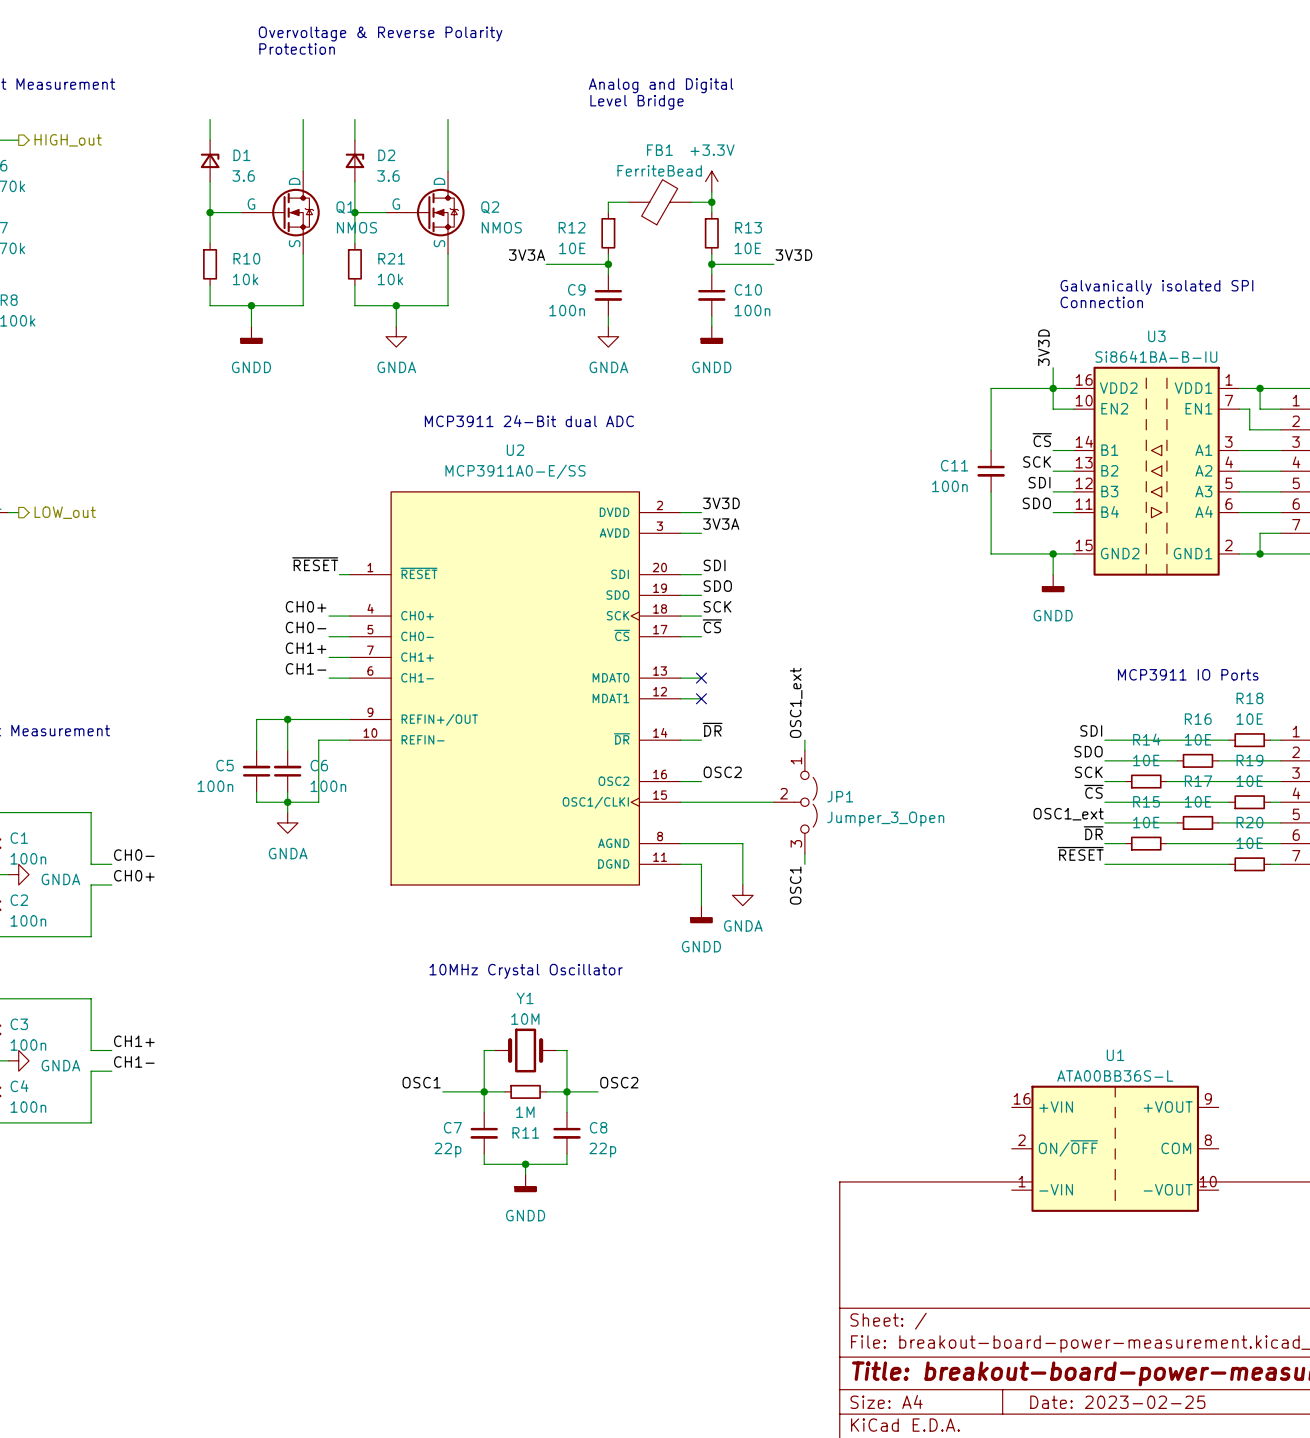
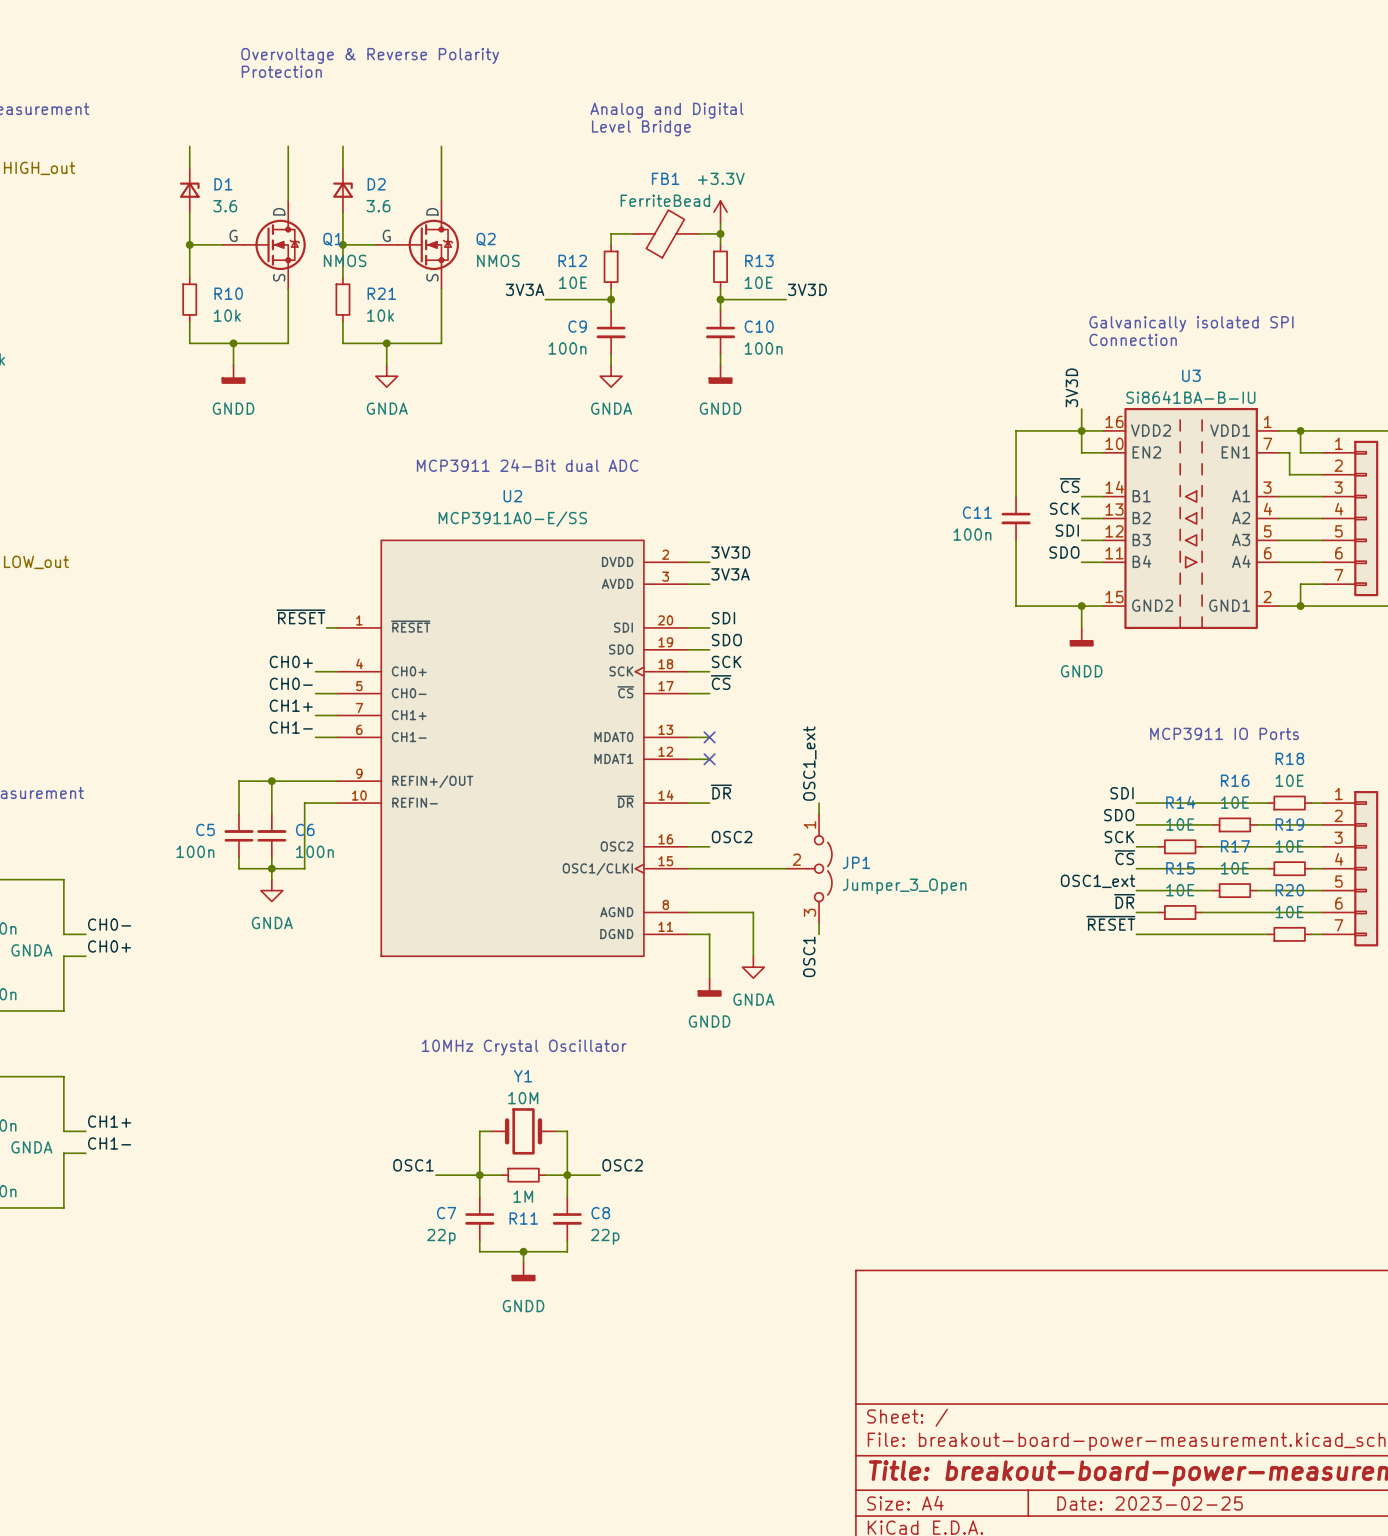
U1: ATA00BB36S-L (1115, 1148) -> none

